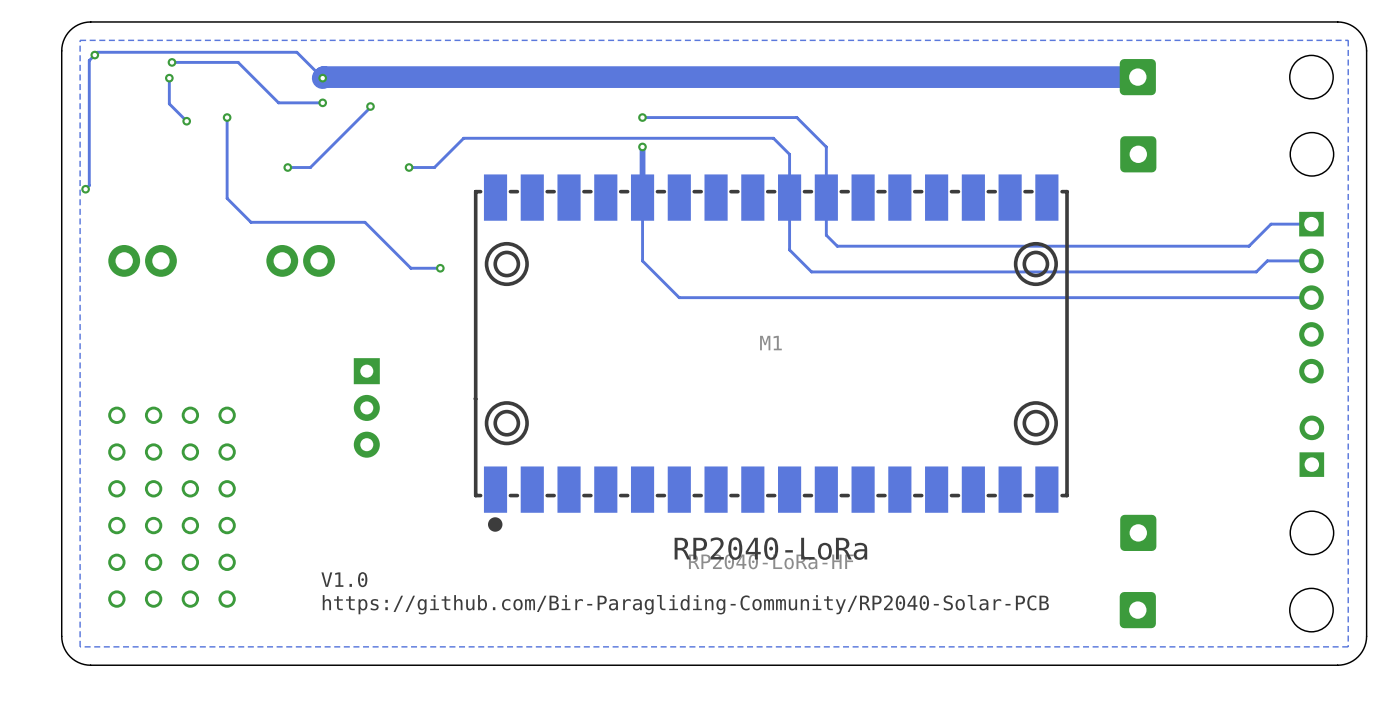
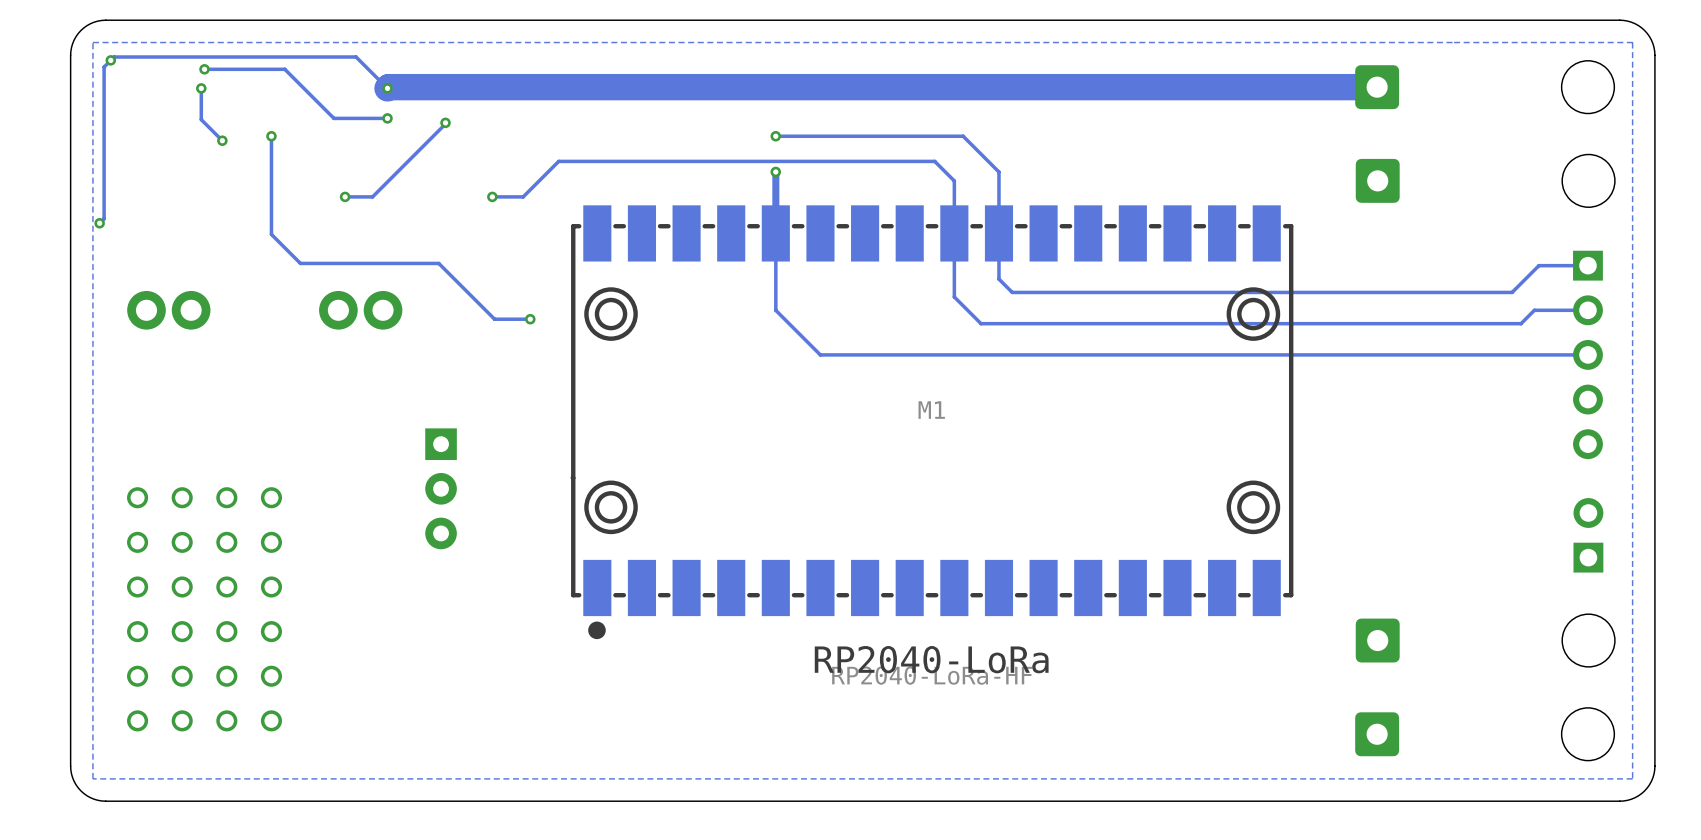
text: V1.0 (344, 579) -> none
text: https://github.com/Bir-Paragliding-Community/RP2040-Solar-PCB (685, 604) -> none

